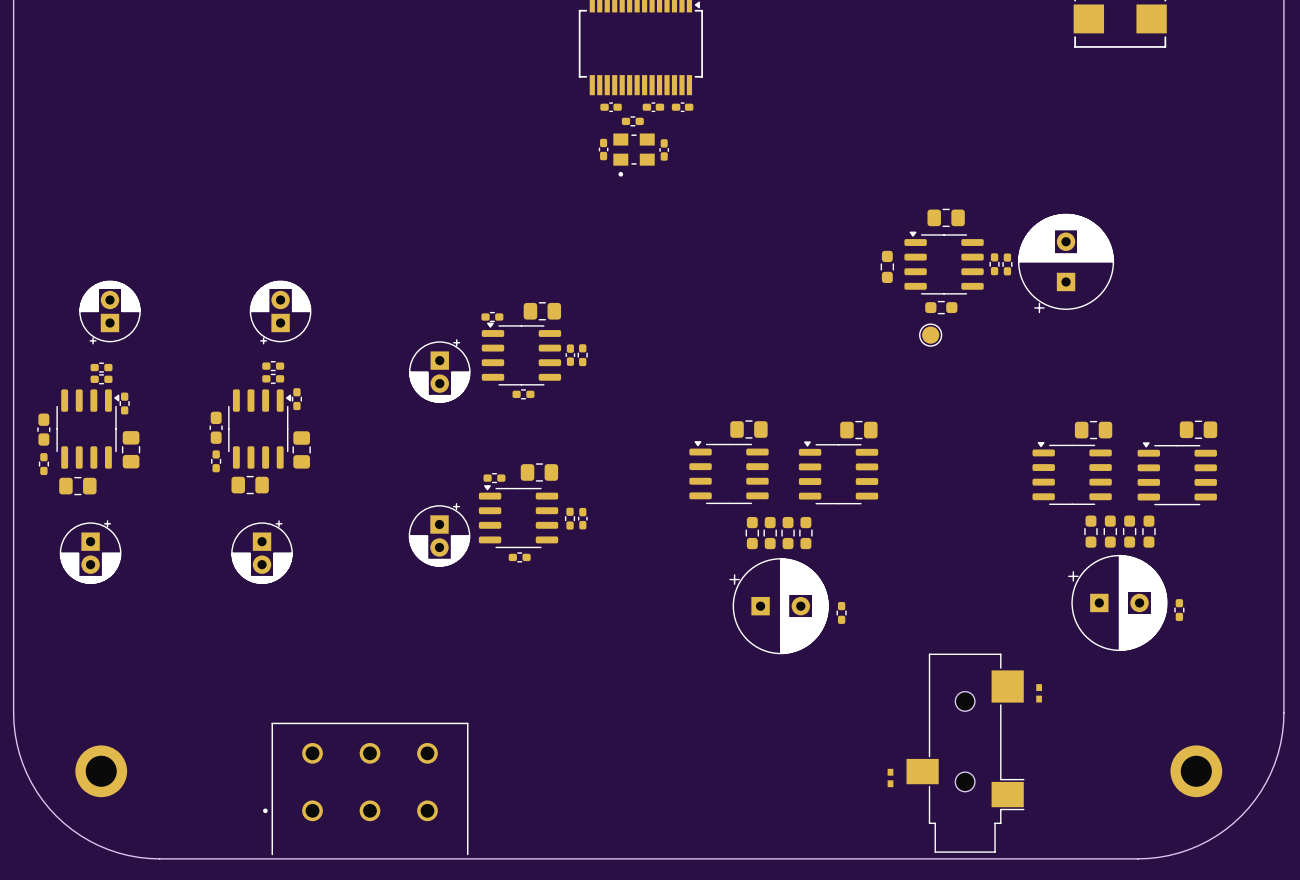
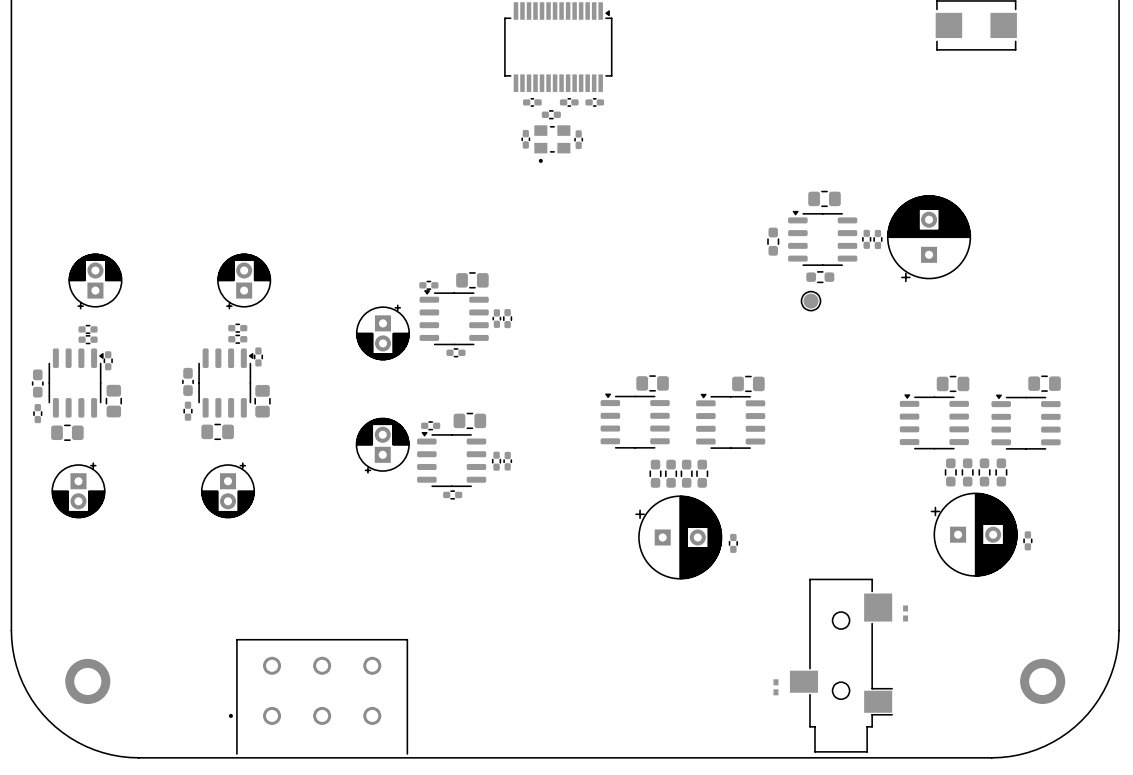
part rotation: 0° (439, 534) -> 180° (382, 445)

